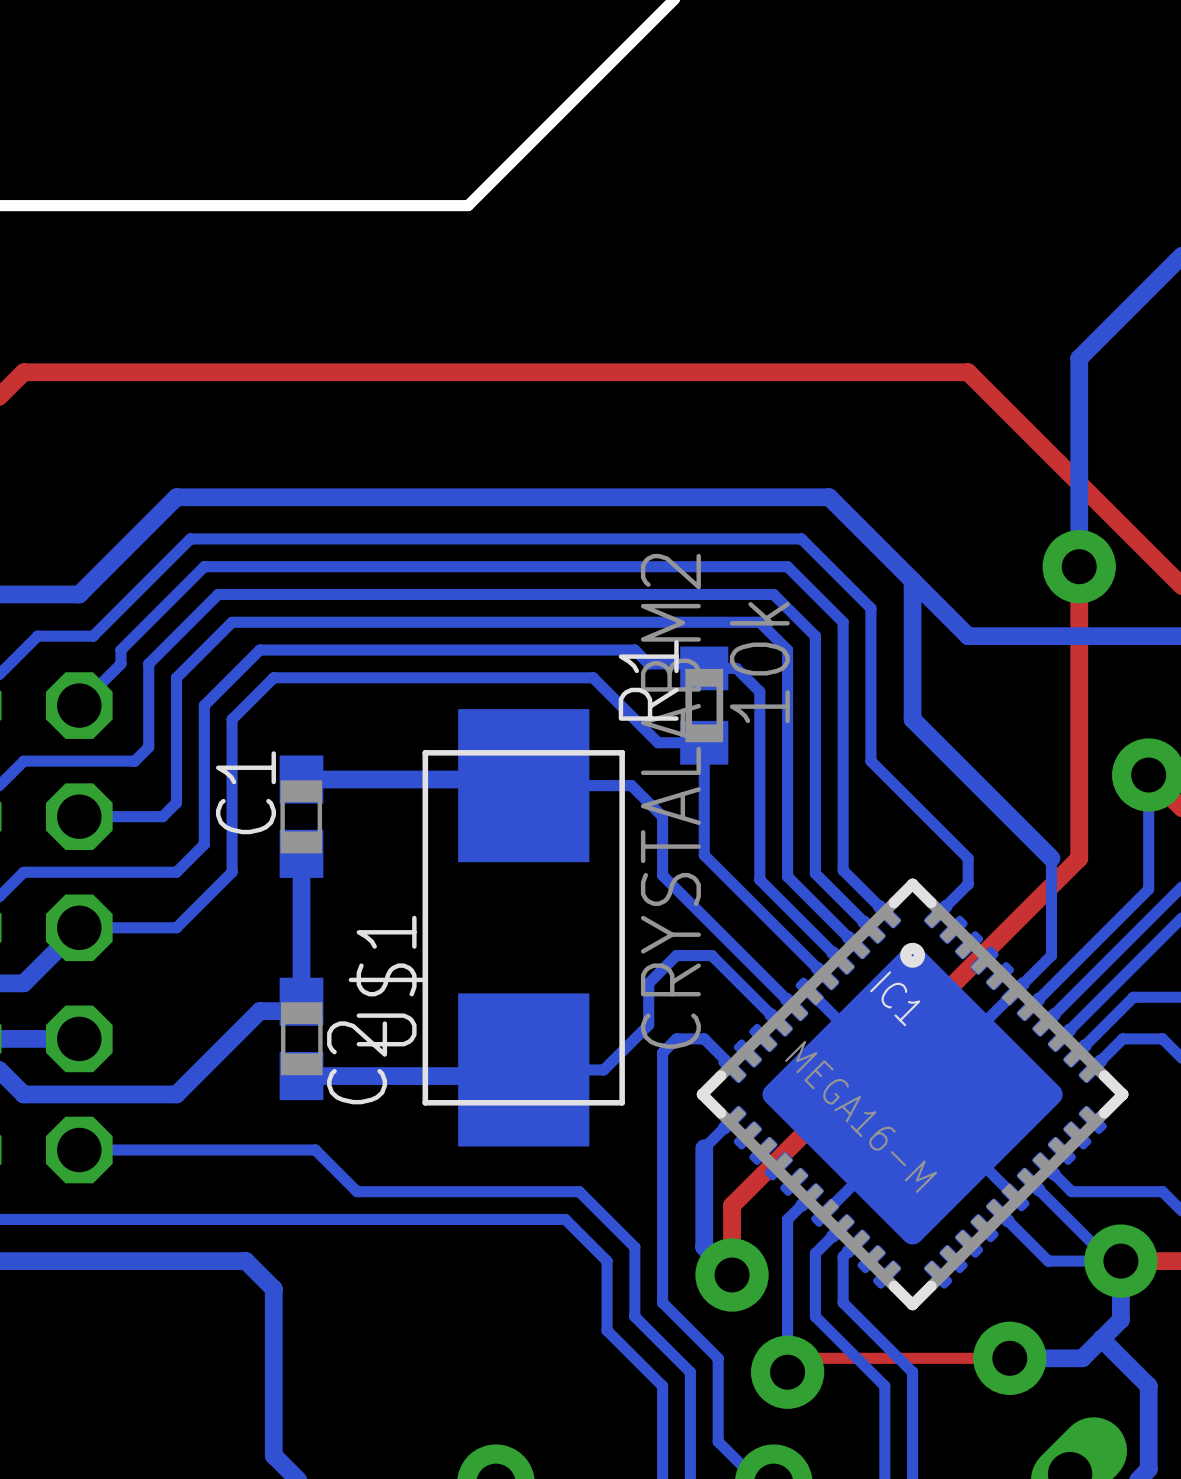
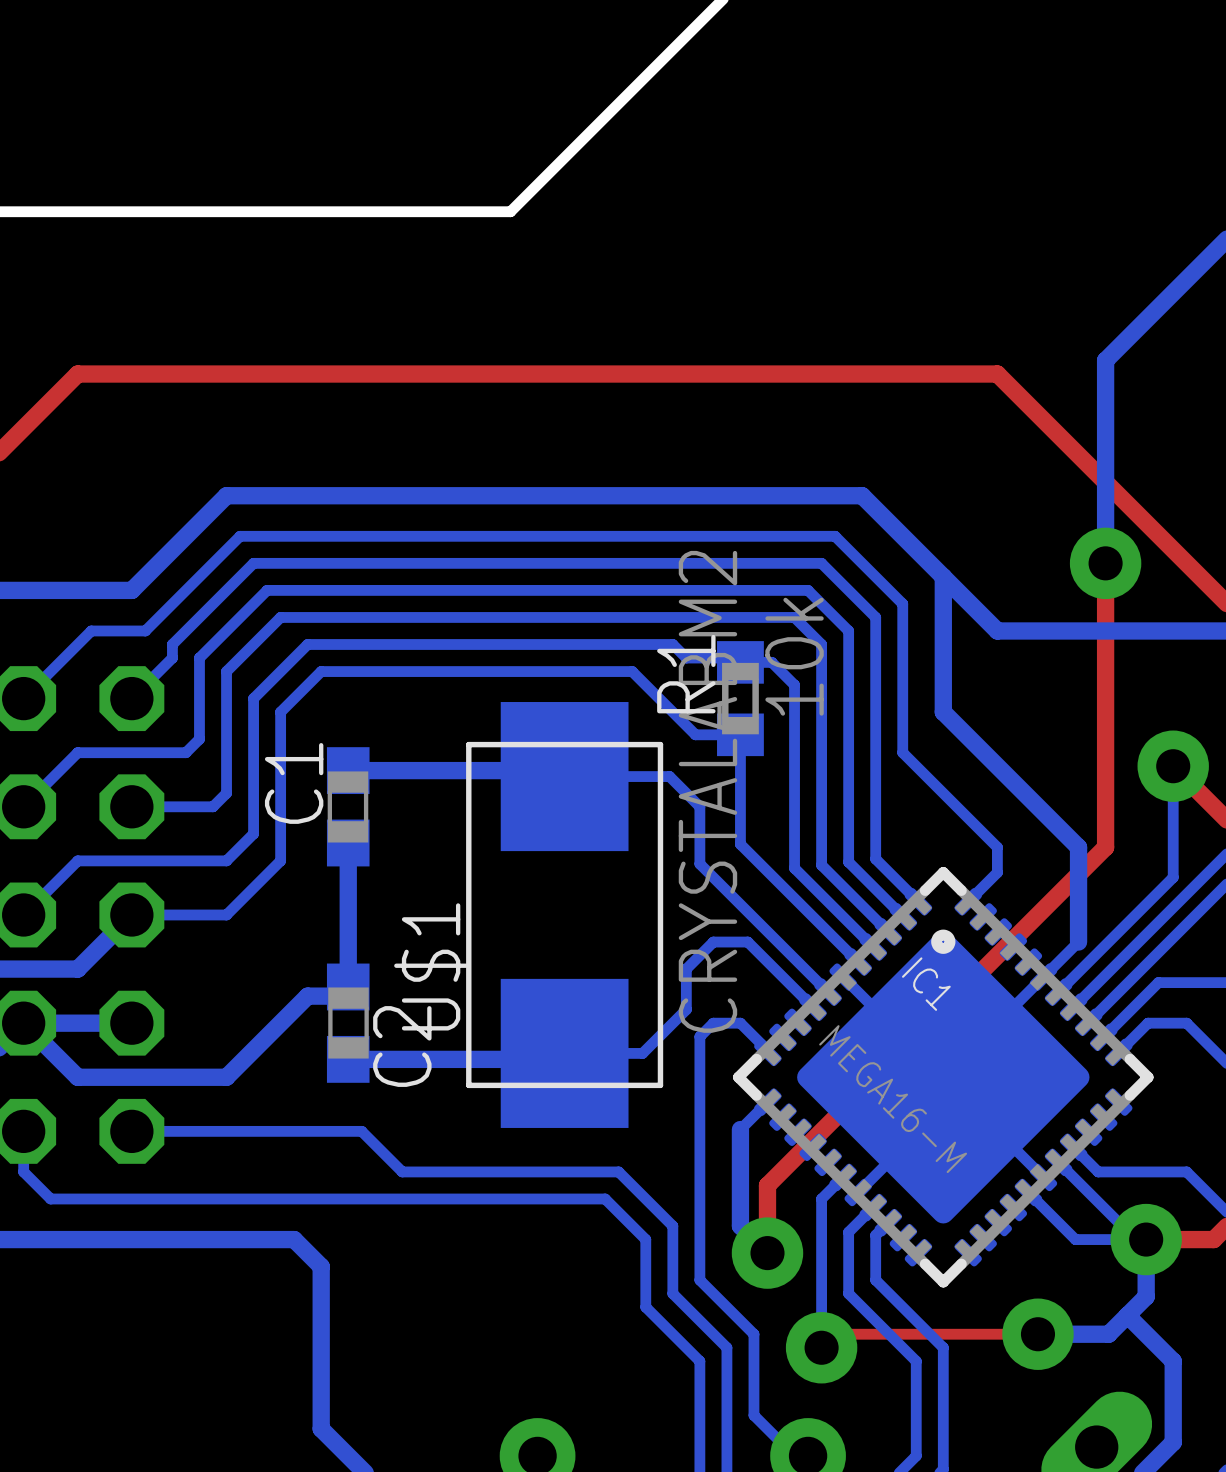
bottom track width: thin (1051, 858) (1051, 955) -> thick (1078, 847) (1078, 942)

